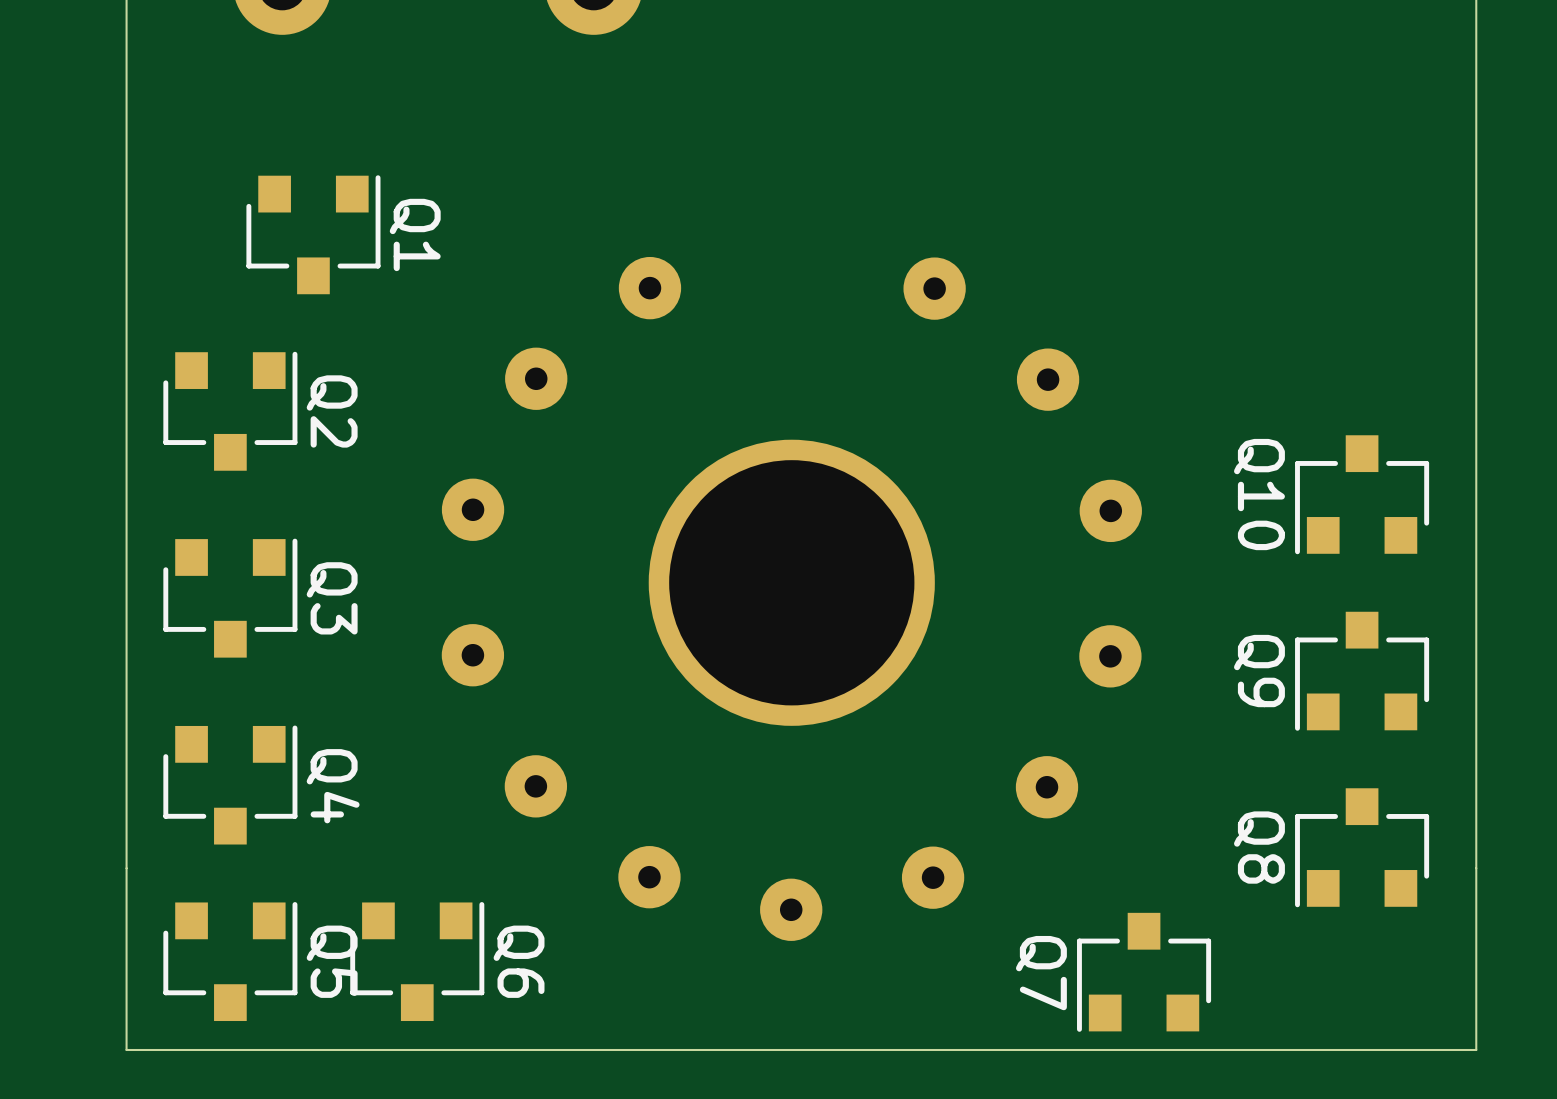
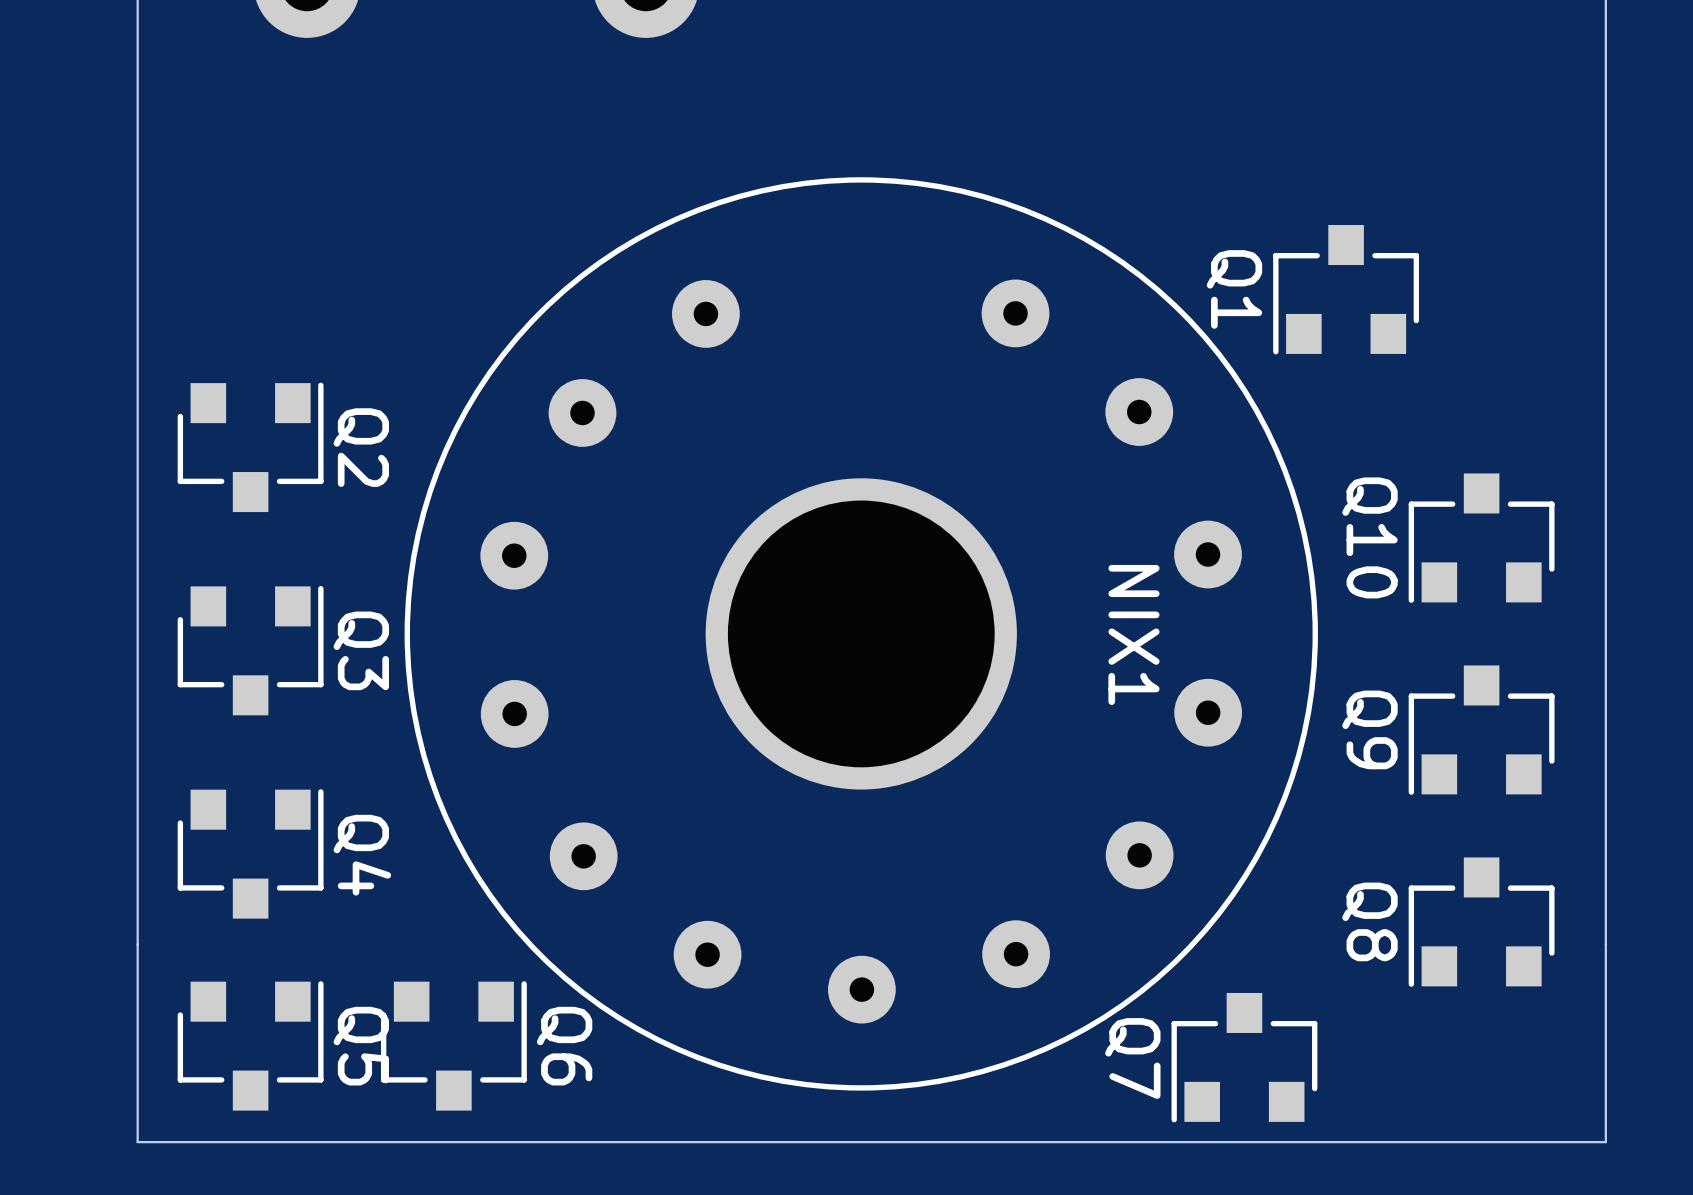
Q1 rotation: 0° (313, 234) -> 180° (1346, 289)
Q1 position: (313, 234) -> (1346, 289)
NIX1 side: top (791, 598) -> bottom (861, 633)

